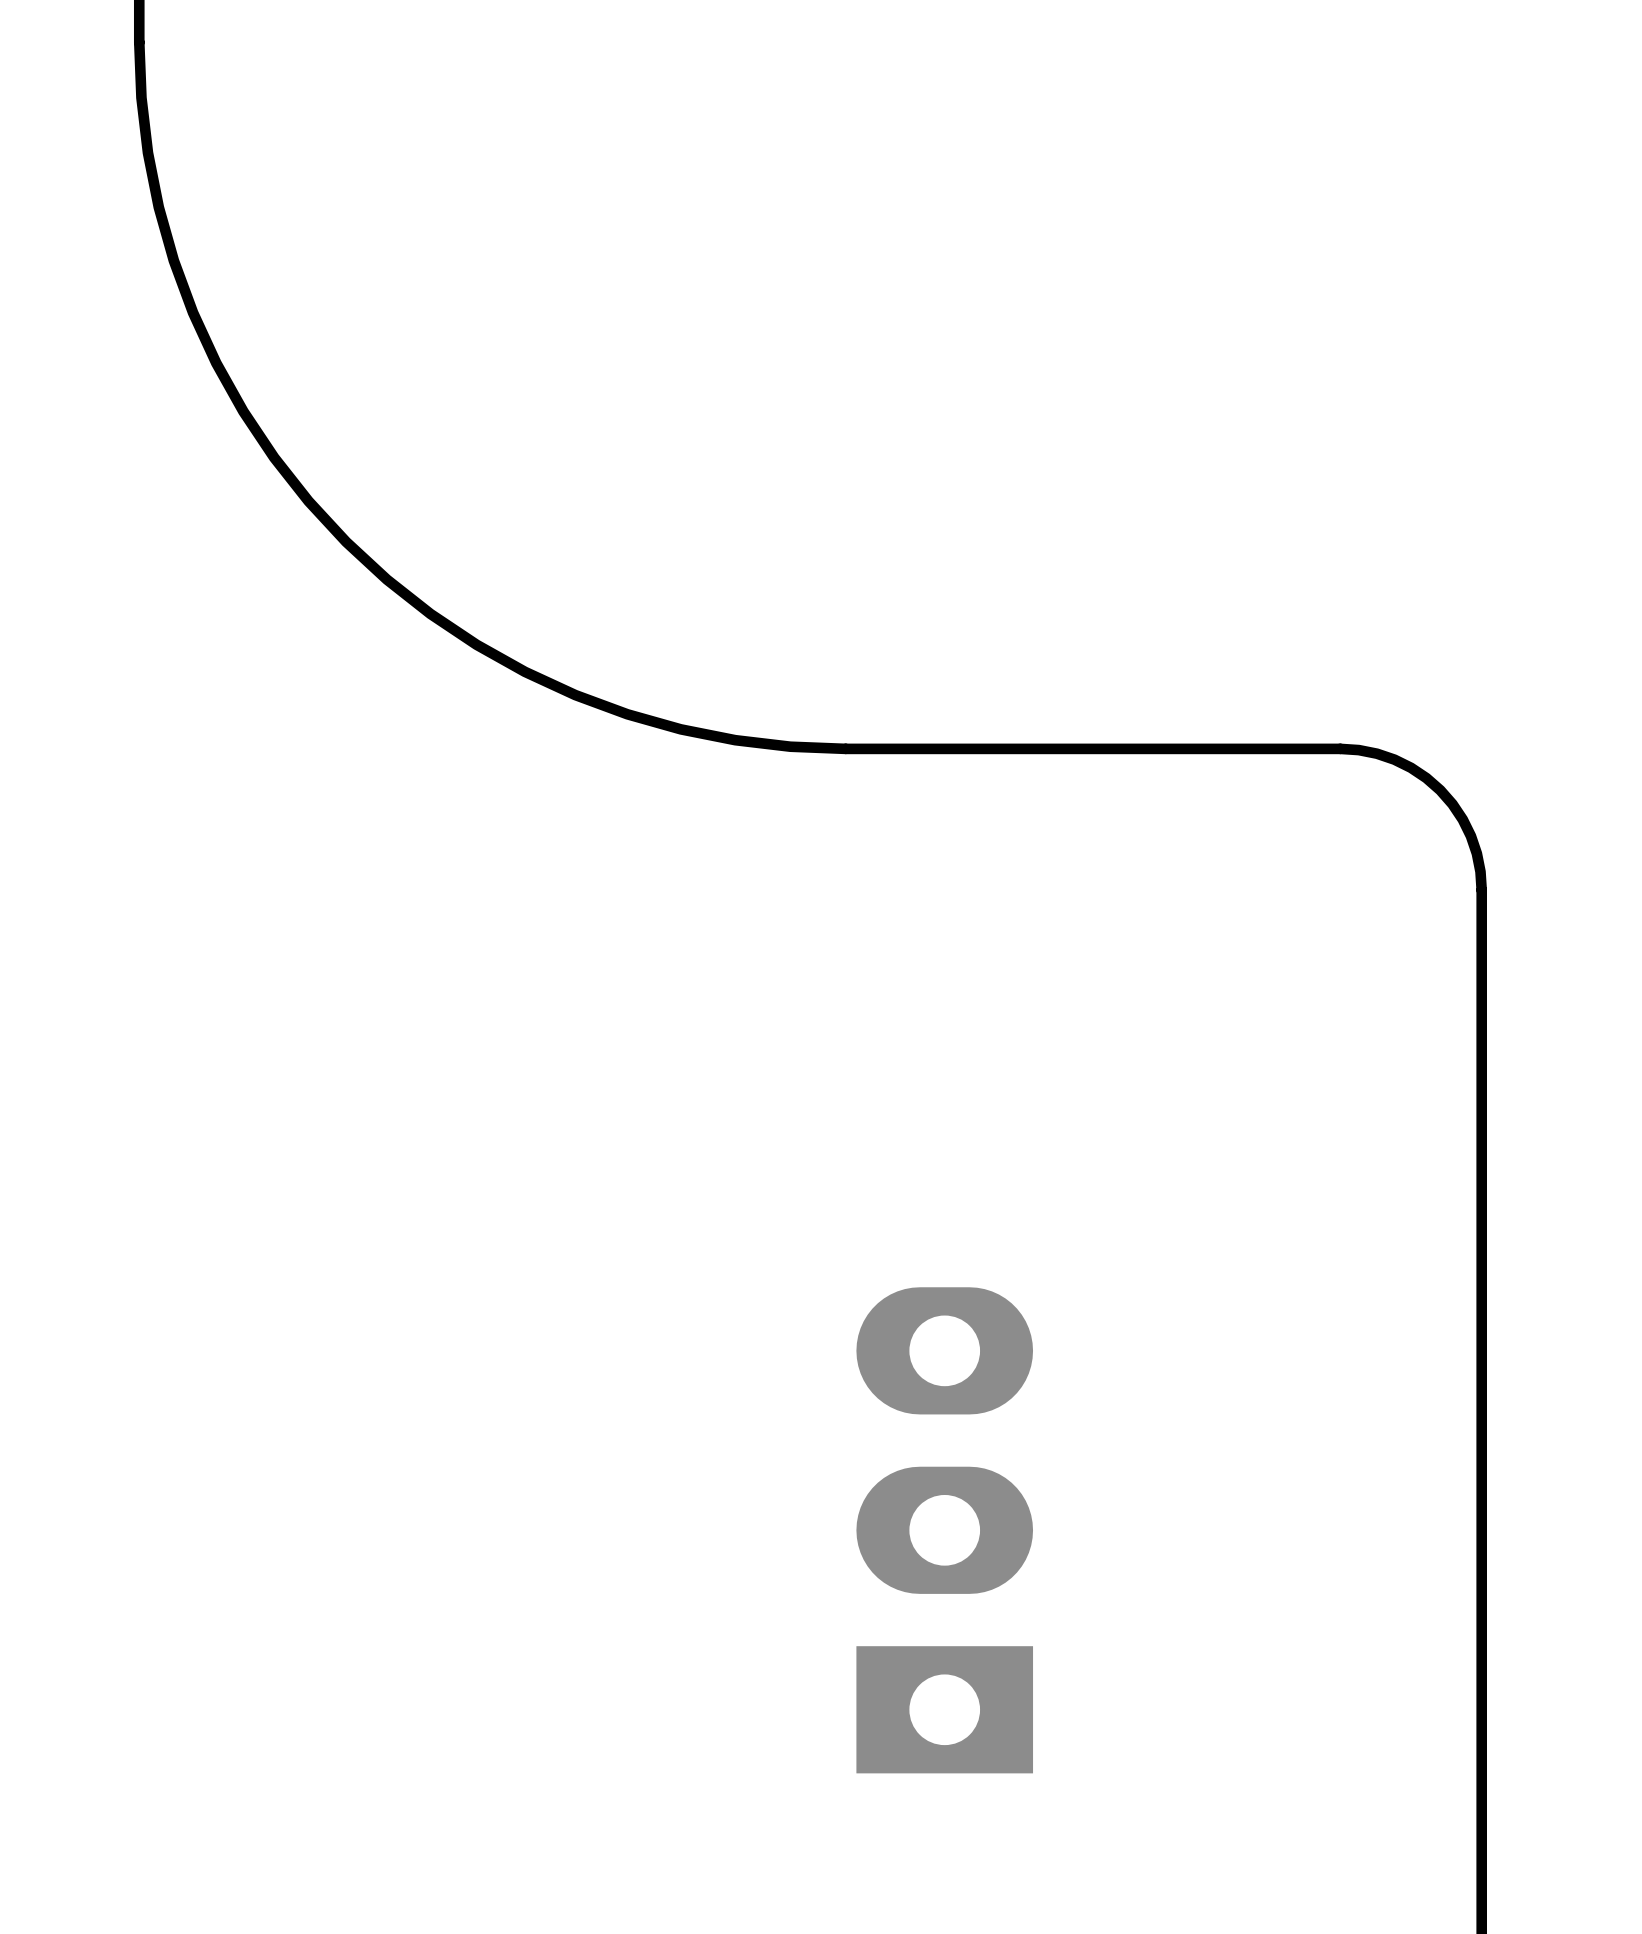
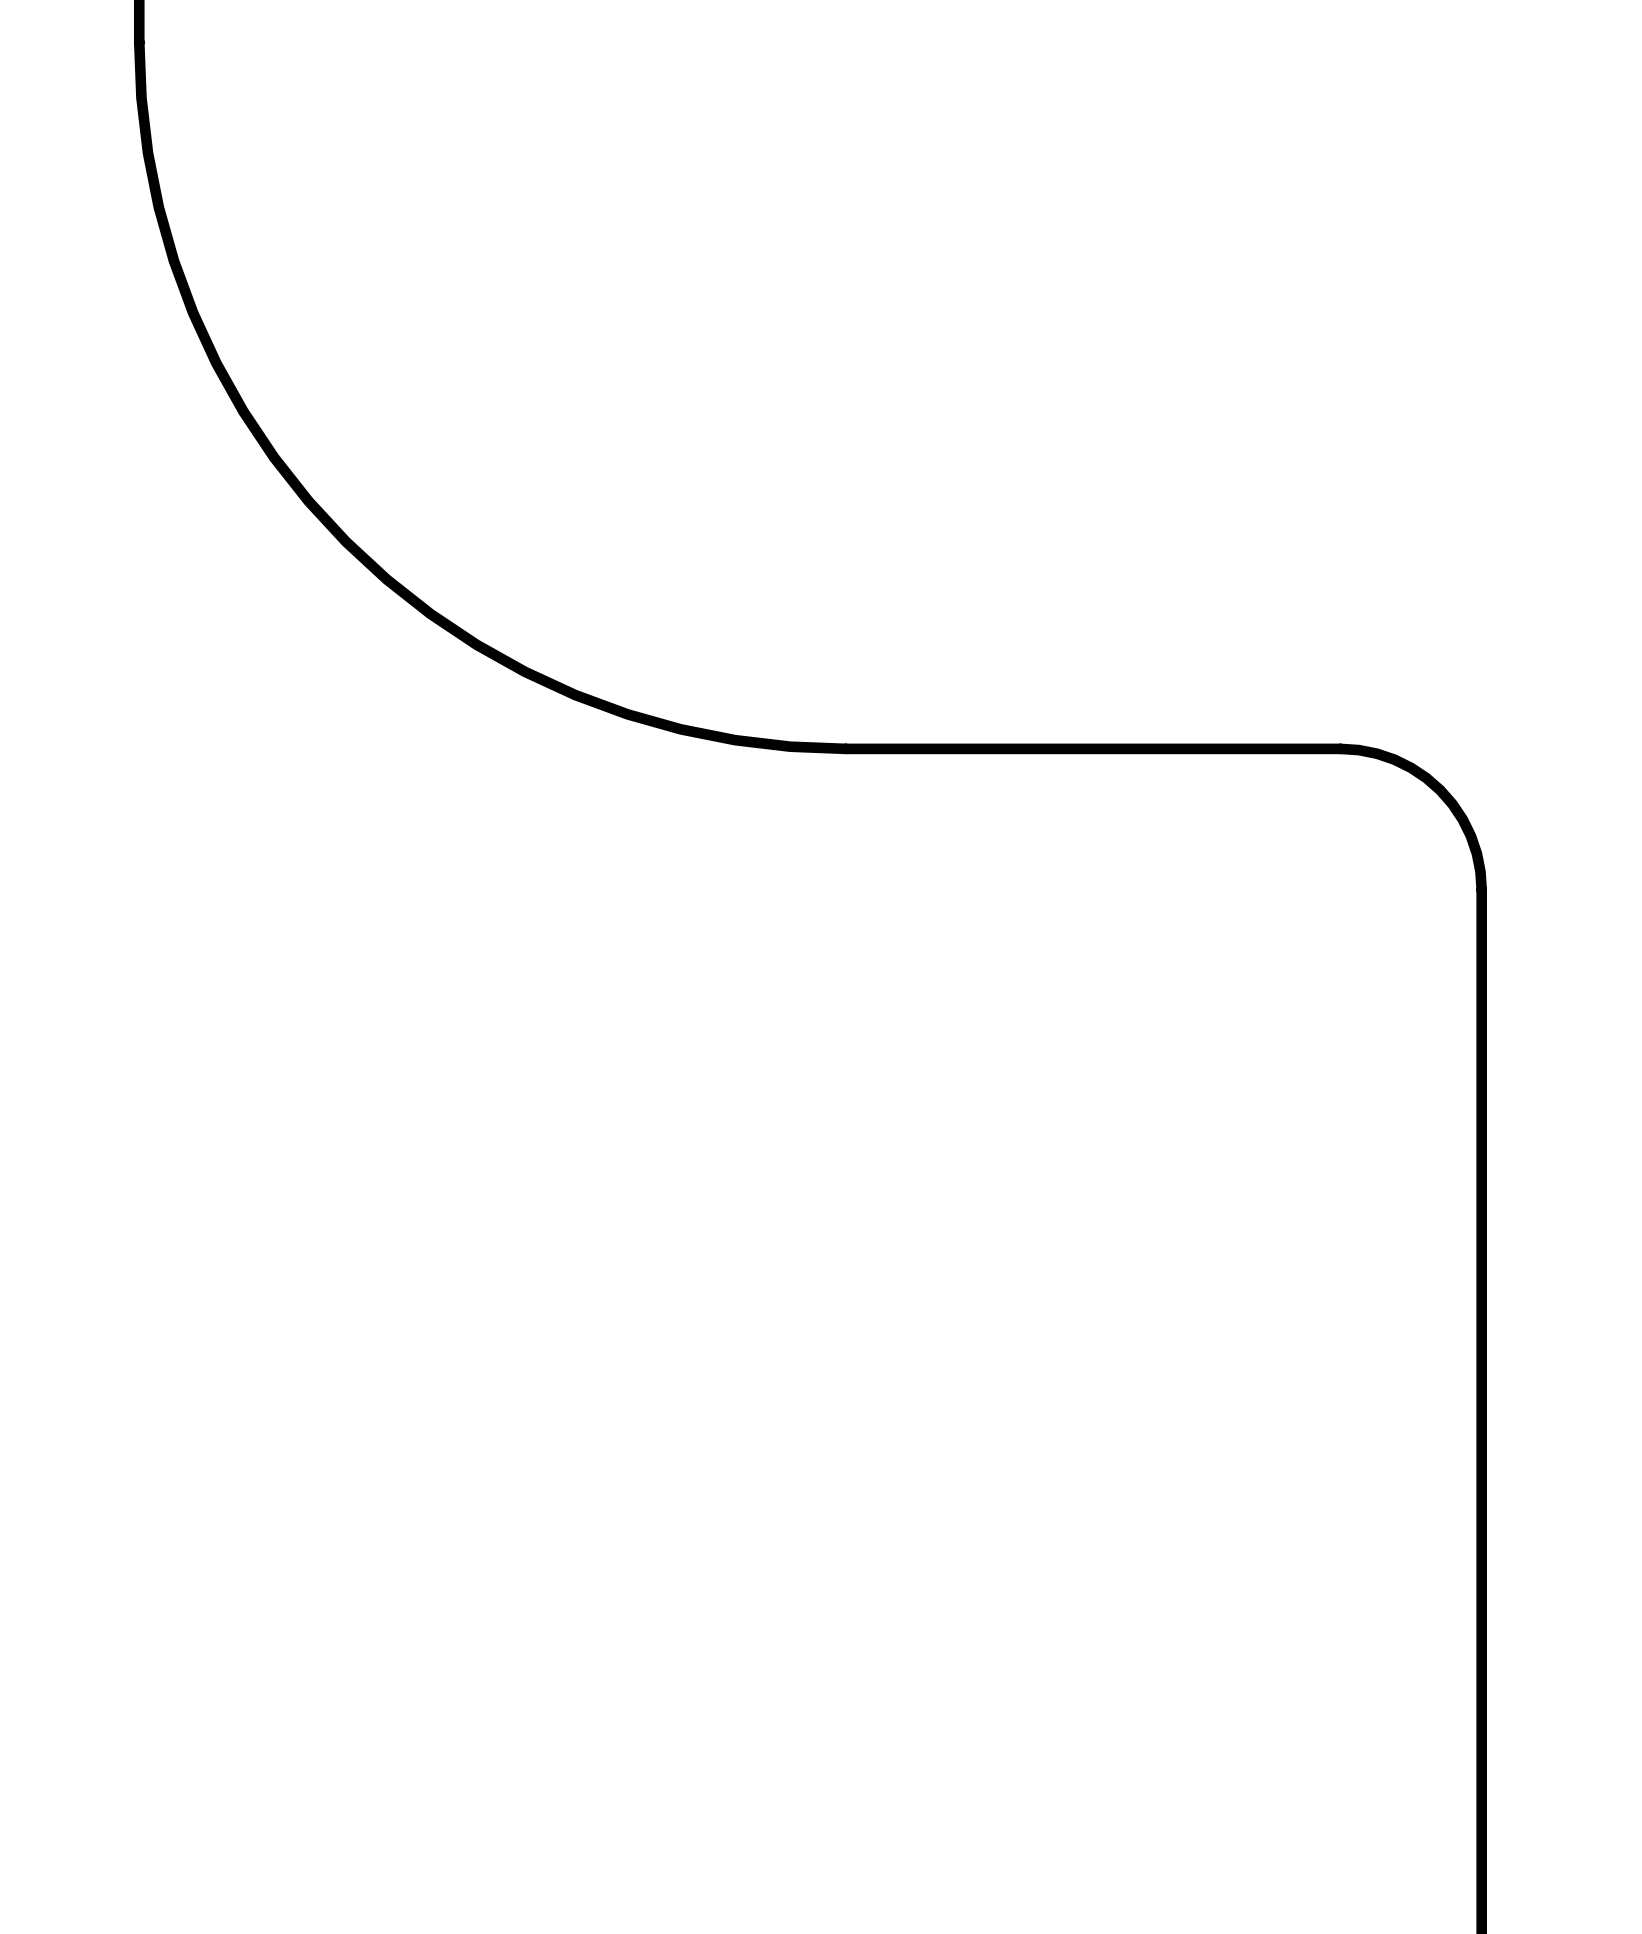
part: (944, 1530) -> none

